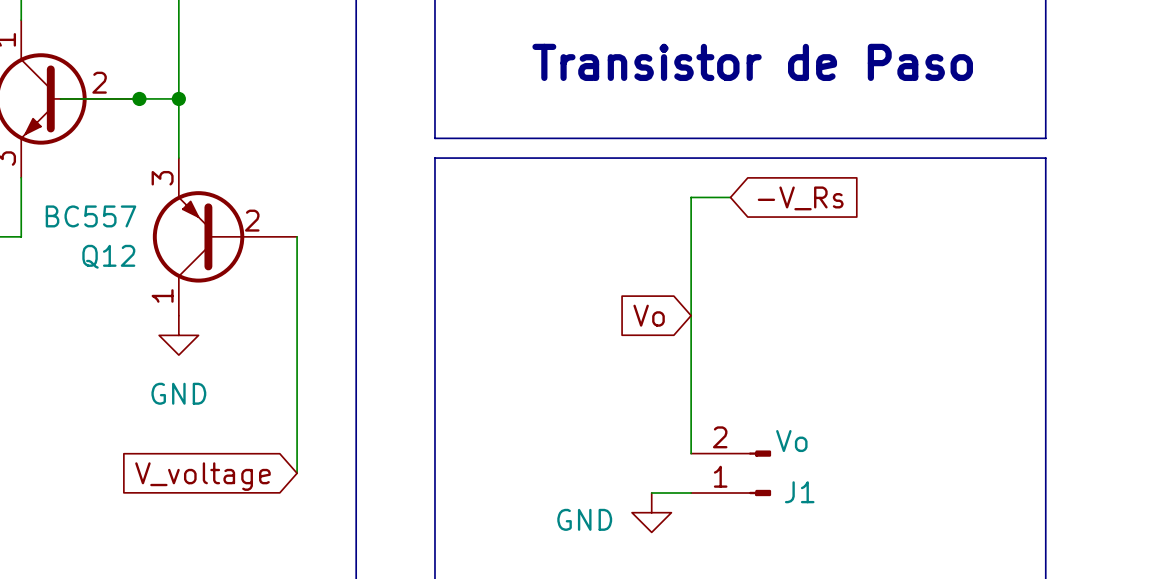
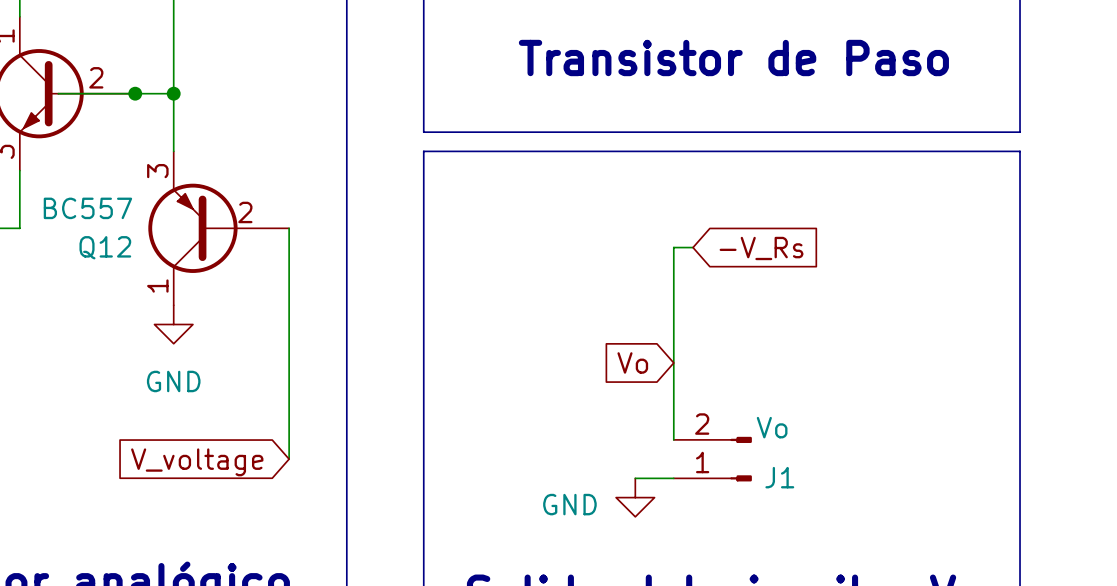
wire: (730, 197) (691, 197) (691, 256) -> (693, 247) (673, 247)
global label position: -V_Rs (800, 198) -> -V_Rs (761, 248)
global label position: Vo (649, 315) -> Vo (632, 362)

